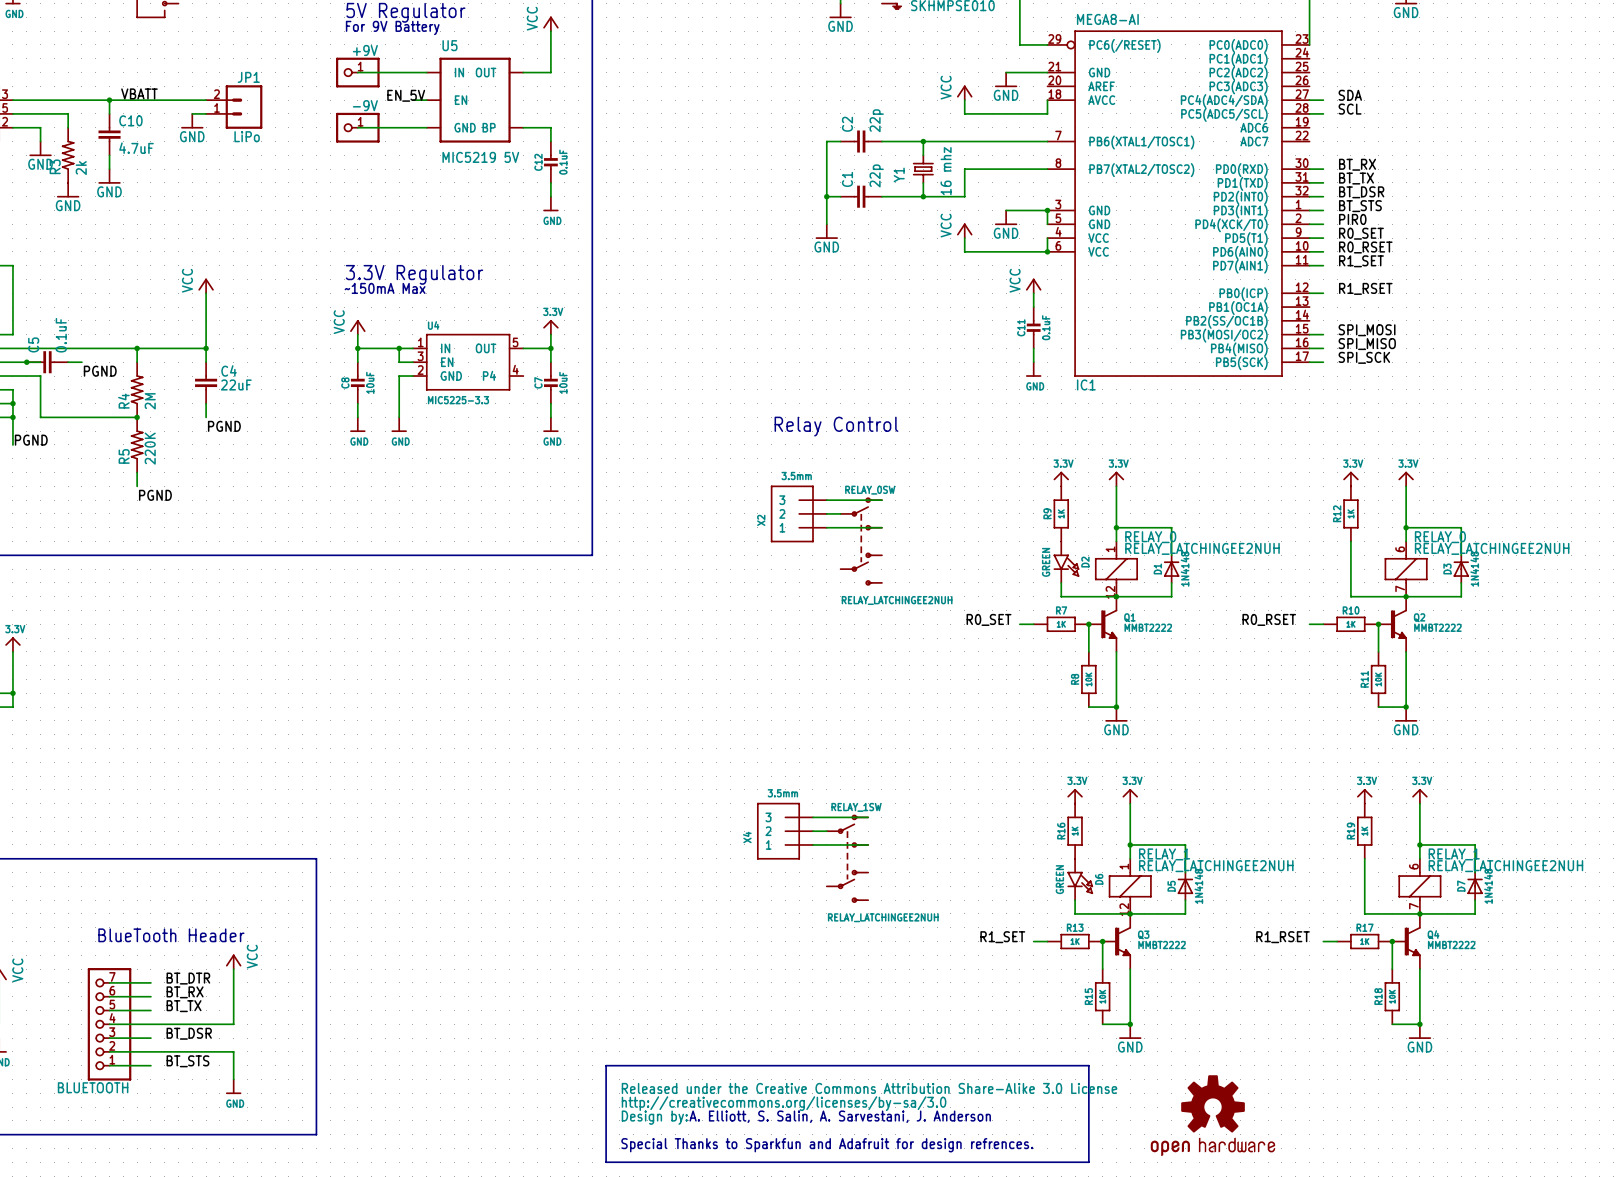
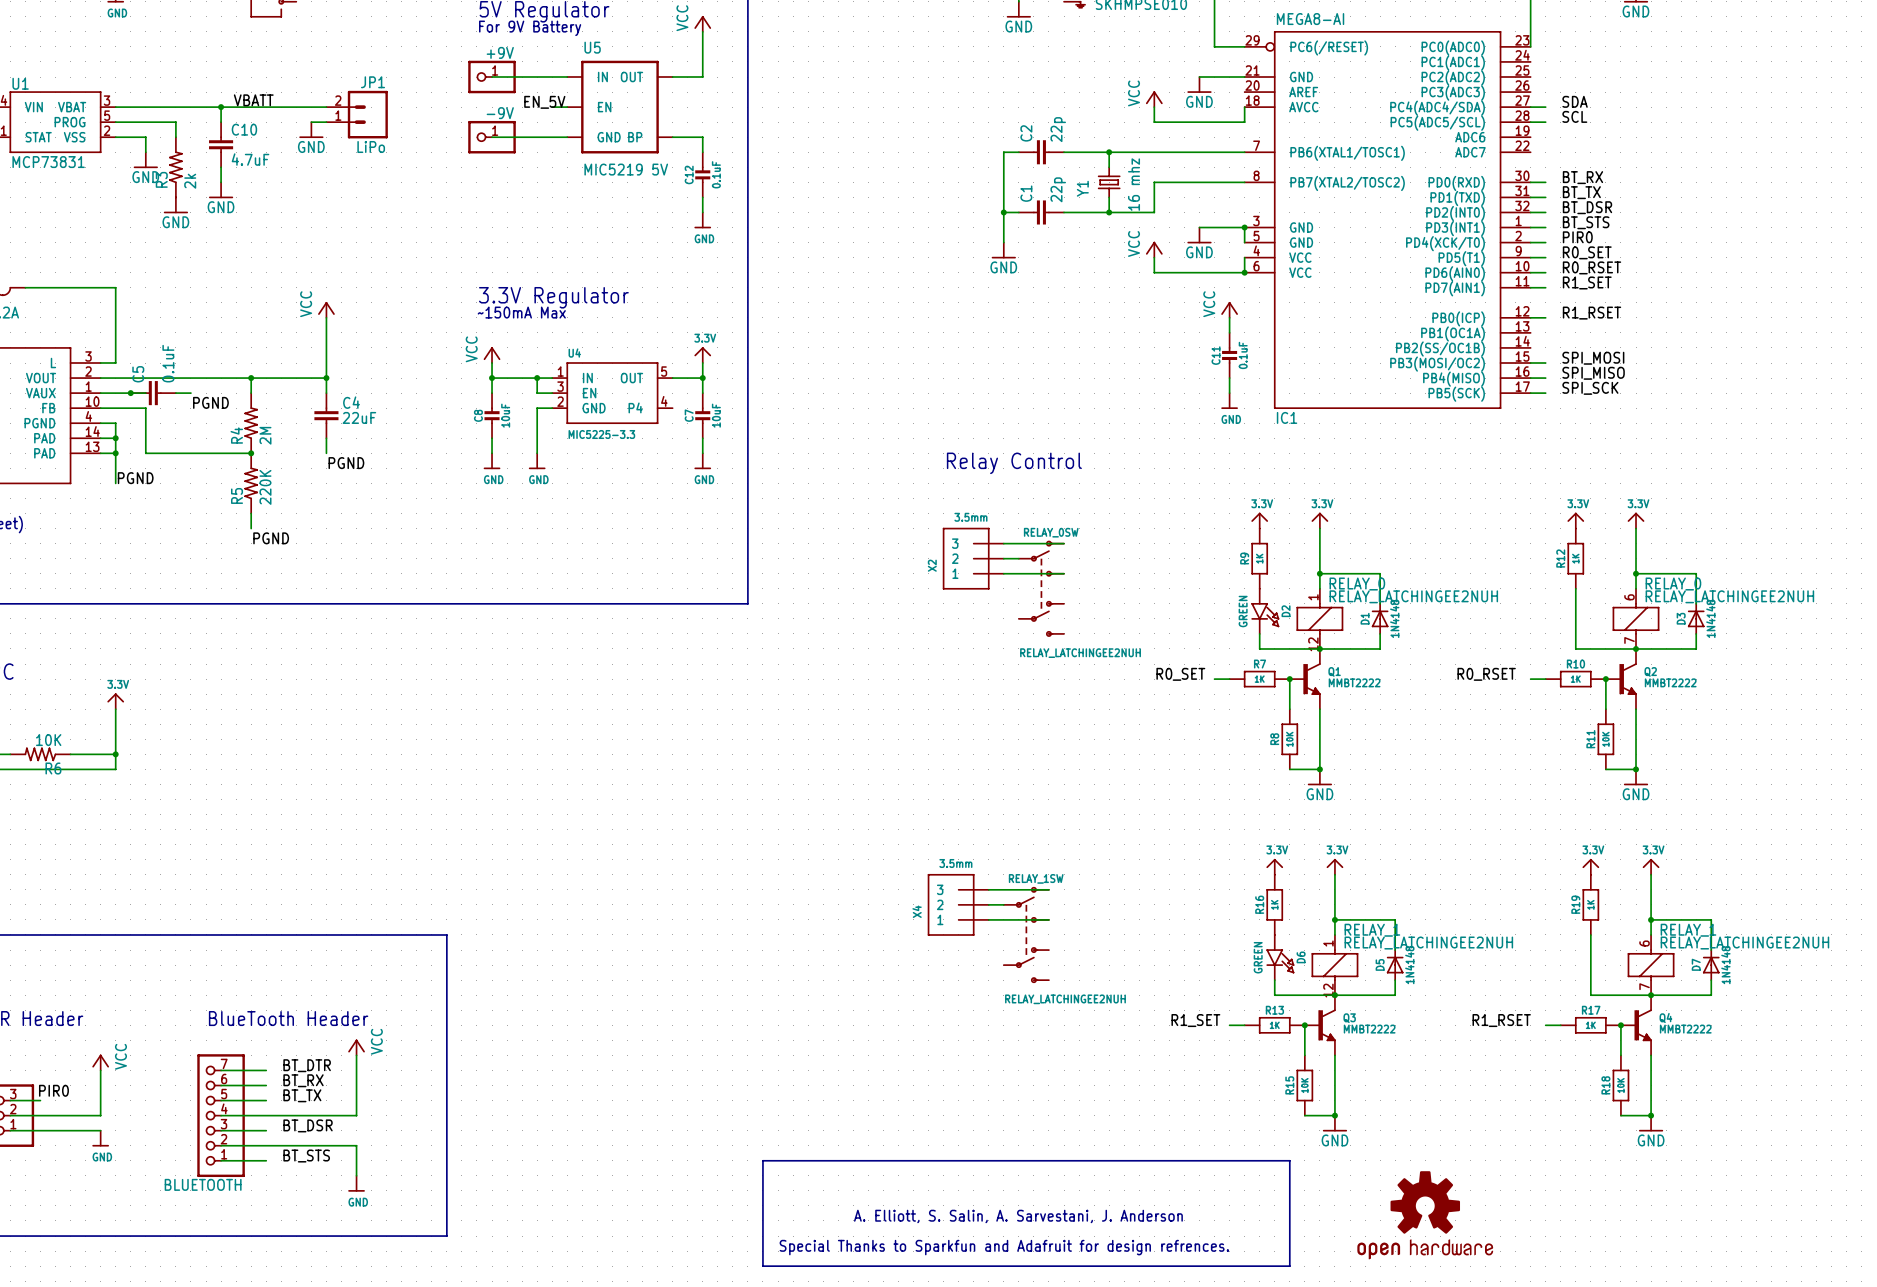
part: (869, 1103) -> none

